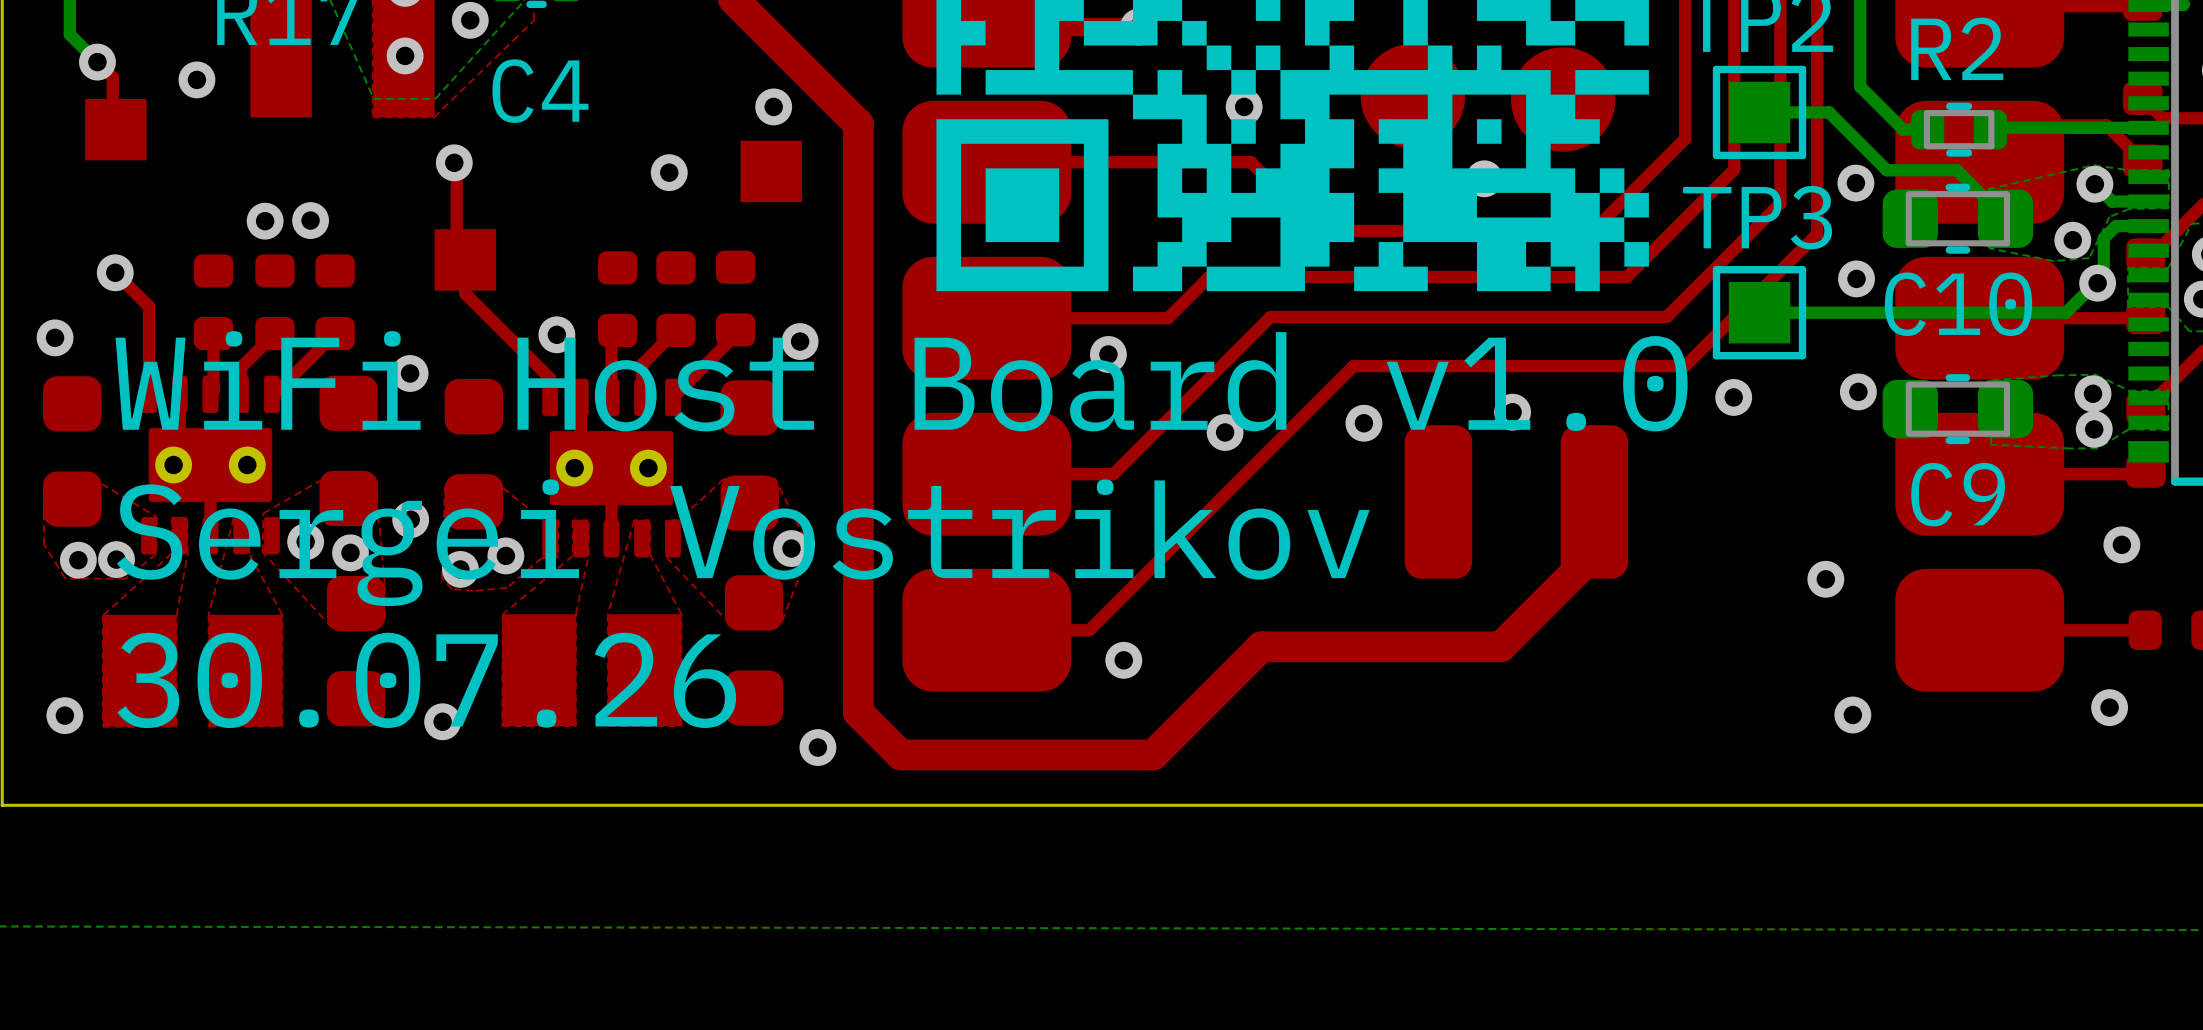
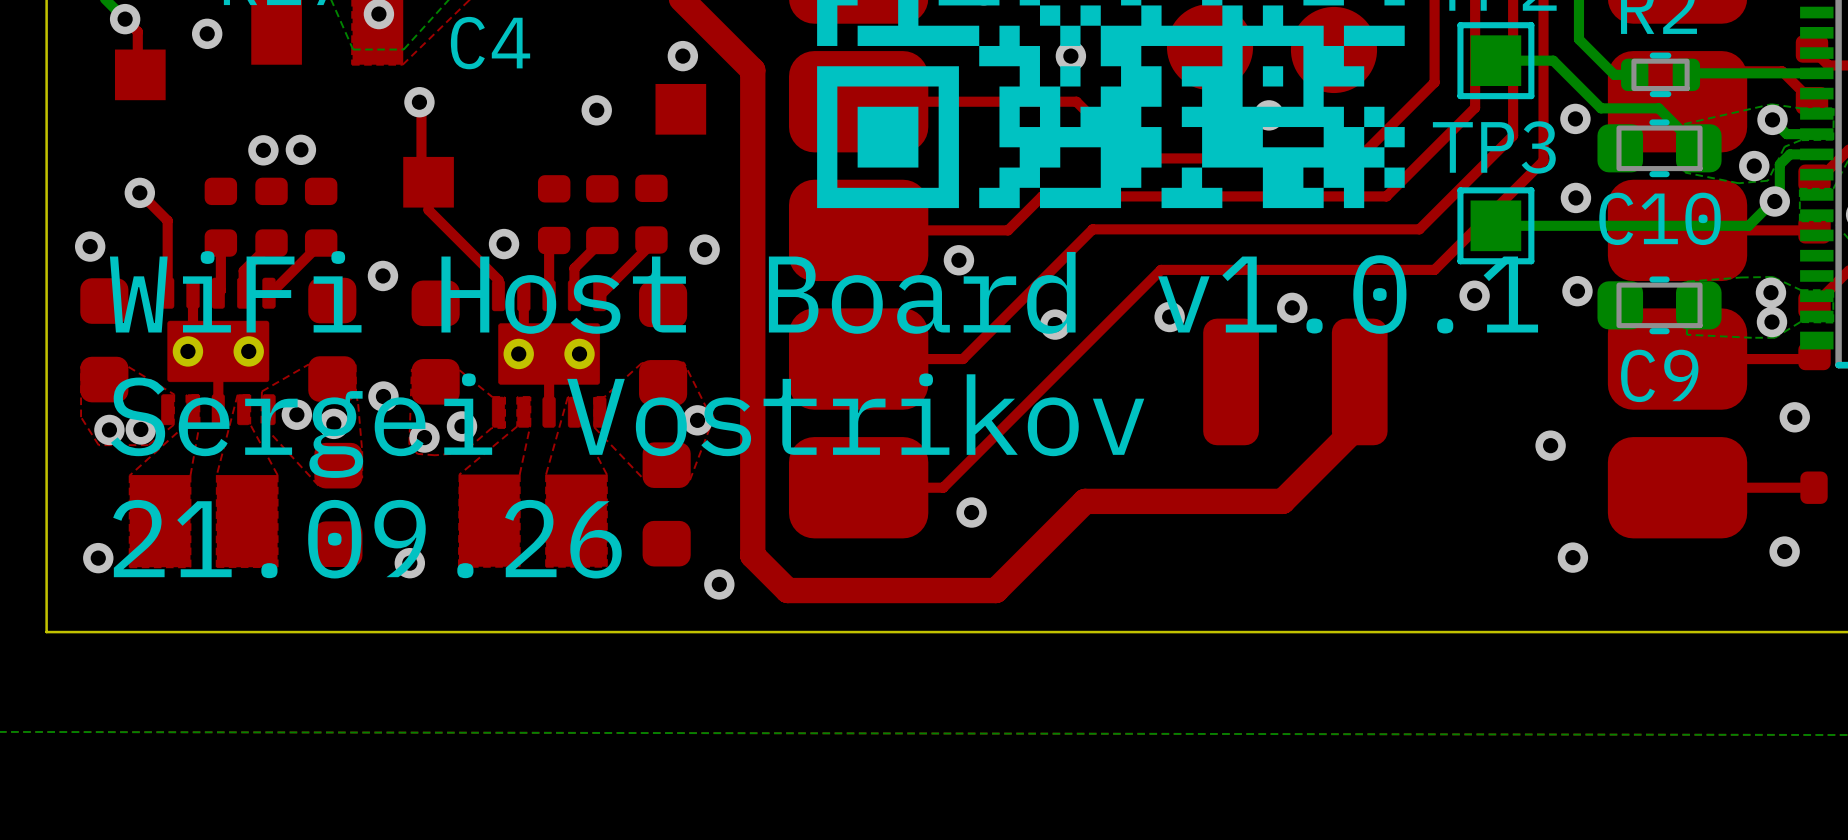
text: WiFi Host Board v1.0 (901, 381) -> WiFi Host Board v1.0.1 (823, 292)
text position: Sergei Vostrikov (743, 542) -> Sergei Vostrikov (627, 425)
text: 30.07.26 (426, 680) -> 21.09.26 (367, 539)

